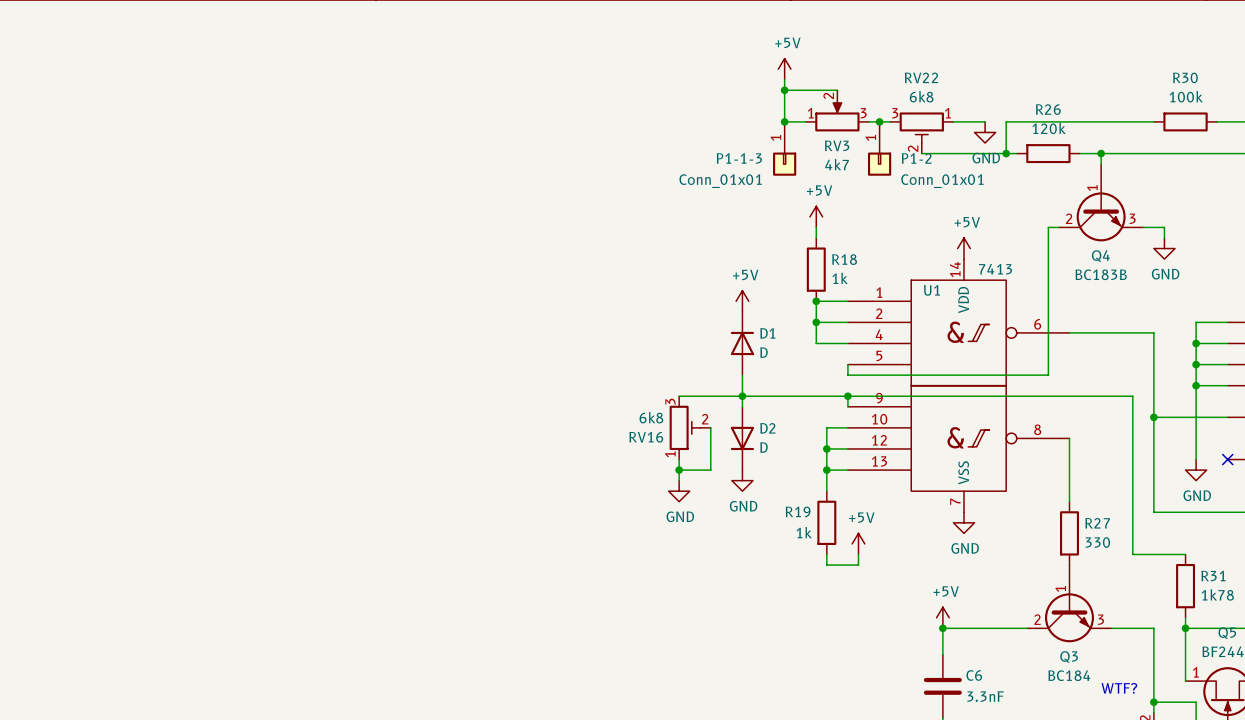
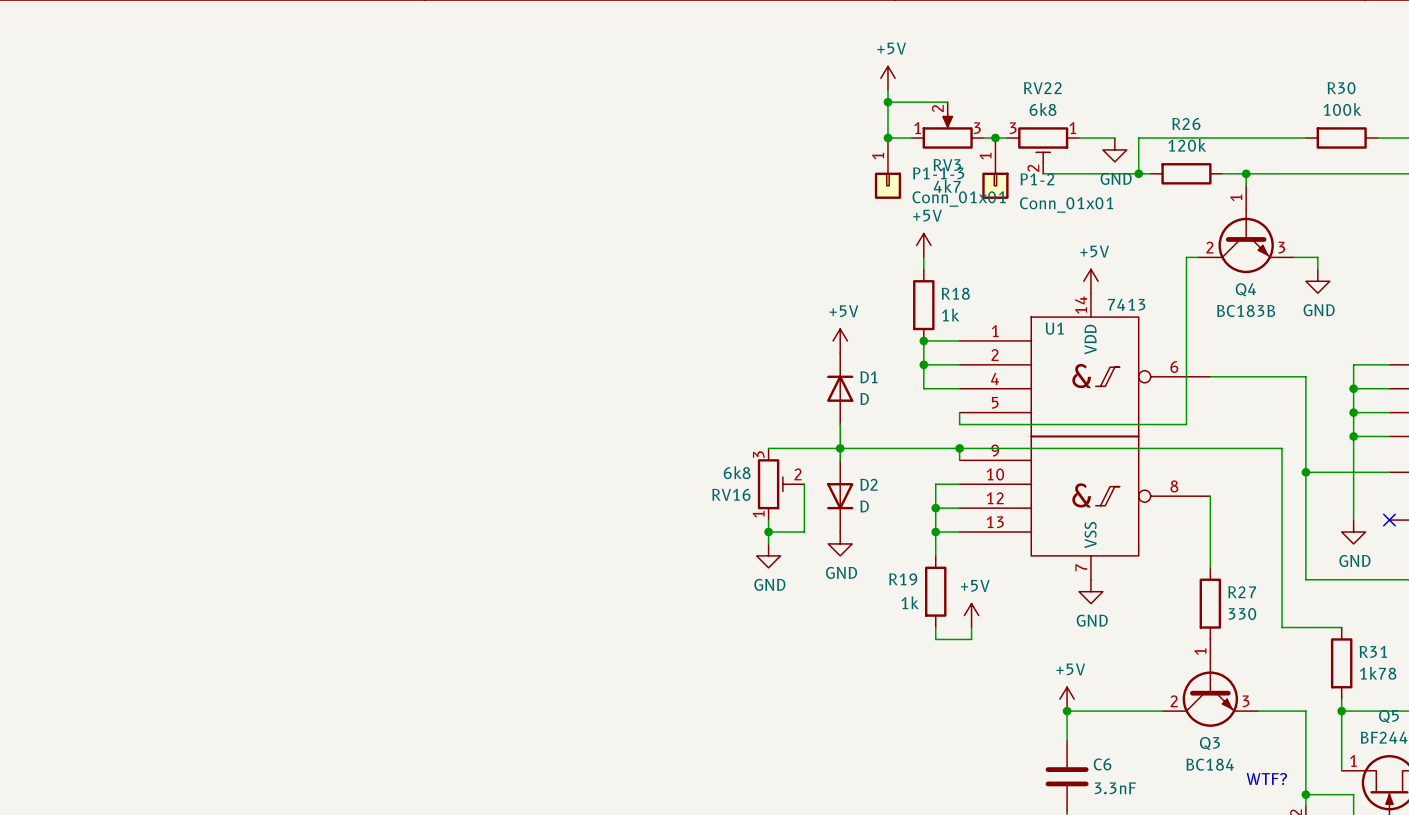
P1-1-3 name position: P1-1-3 (739, 158) -> P1-1-3 (938, 173)
Q4 symbol: [1058, 164, 1144, 242] -> [1198, 185, 1294, 274]
P1-1-3 value position: Conn_01x01 (720, 181) -> Conn_01x01 (959, 199)
Q3 symbol: [1027, 565, 1112, 643] -> [1162, 639, 1259, 727]

